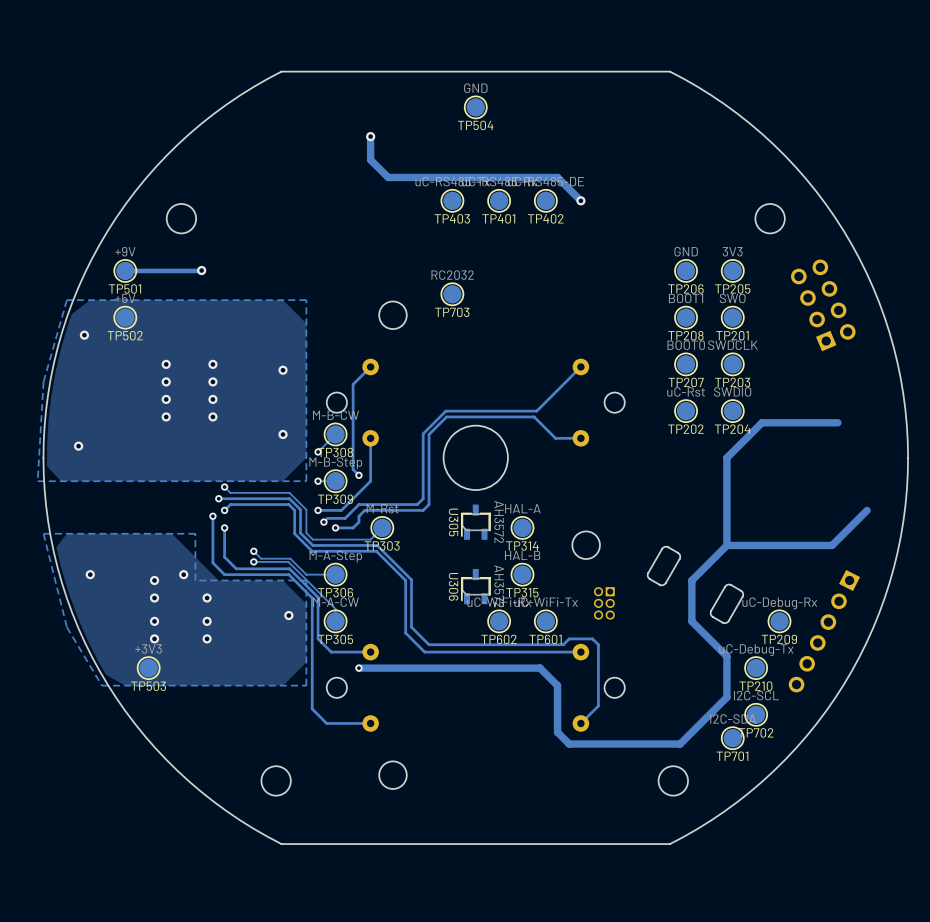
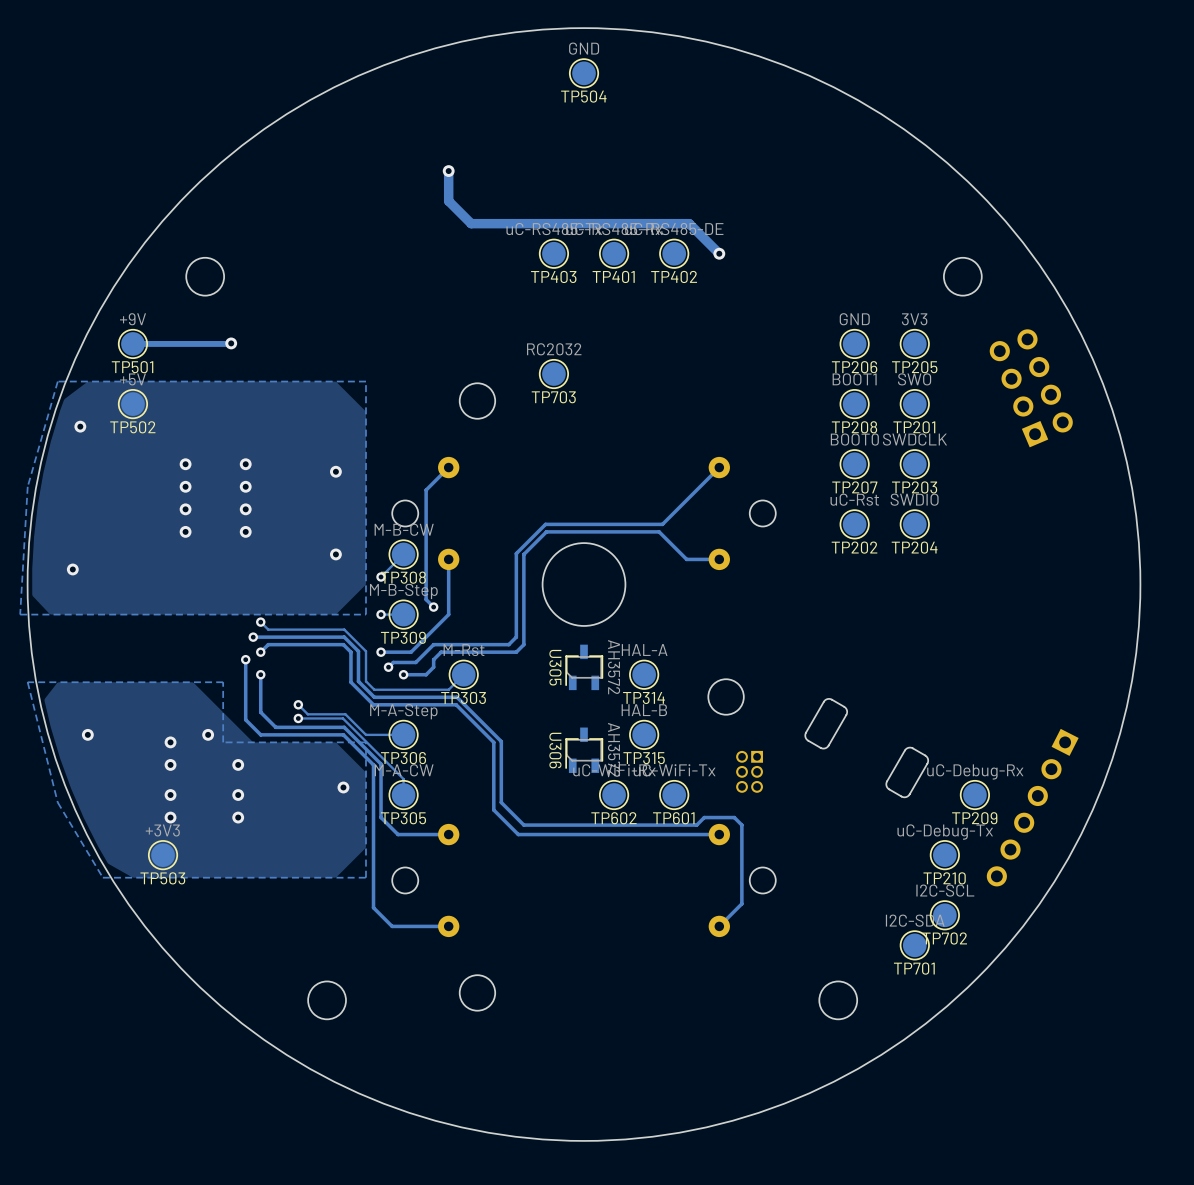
round board edge: none -> [27, 27, 1141, 1142]
board edge: (670, 71) (281, 71) (226, 104) (177, 144) (135, 191) (116, 217) (92, 258) (72, 302) (57, 347) (50, 378) (44, 426) (43, 457) (46, 505) (53, 552) (66, 598) (84, 642) (99, 670) (116, 698) (145, 736) (166, 759) (201, 792) (240, 820) (281, 844) (670, 844) (724, 811) (773, 771) (816, 723) (835, 698) (859, 656) (879, 613) (893, 568) (900, 536) (906, 489) (908, 457) (905, 410) (897, 363) (884, 317) (873, 287) (851, 244) (835, 217) (806, 179) (773, 144) (737, 113) (711, 95) (670, 71) -> none
TP504 position: (475, 107) -> (584, 73)
track: (837, 422) (761, 422) (726, 457) (726, 545) -> none
track: (867, 510) (832, 545) (726, 545) -> none
track: (726, 545) (691, 580) (691, 621) (726, 656) (726, 697) (680, 744) (569, 744) (557, 732) (557, 685) (540, 668) (358, 668) -> none
via: (358, 668) -> none

